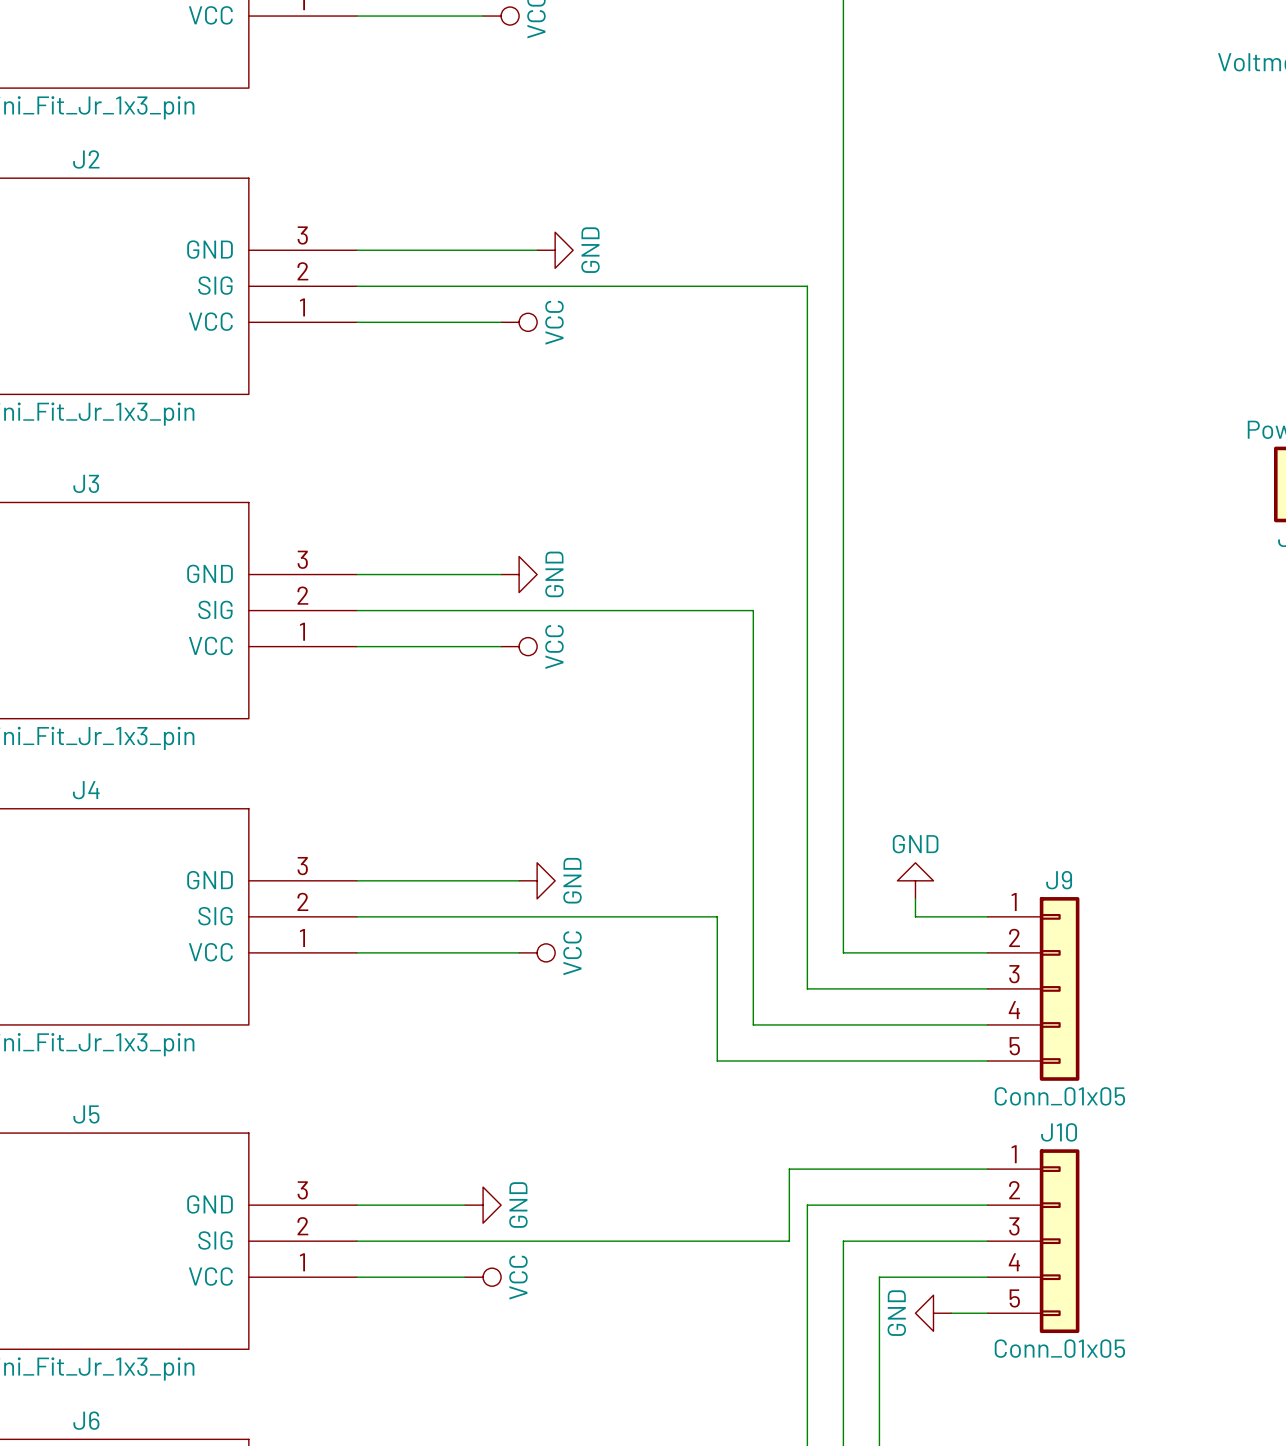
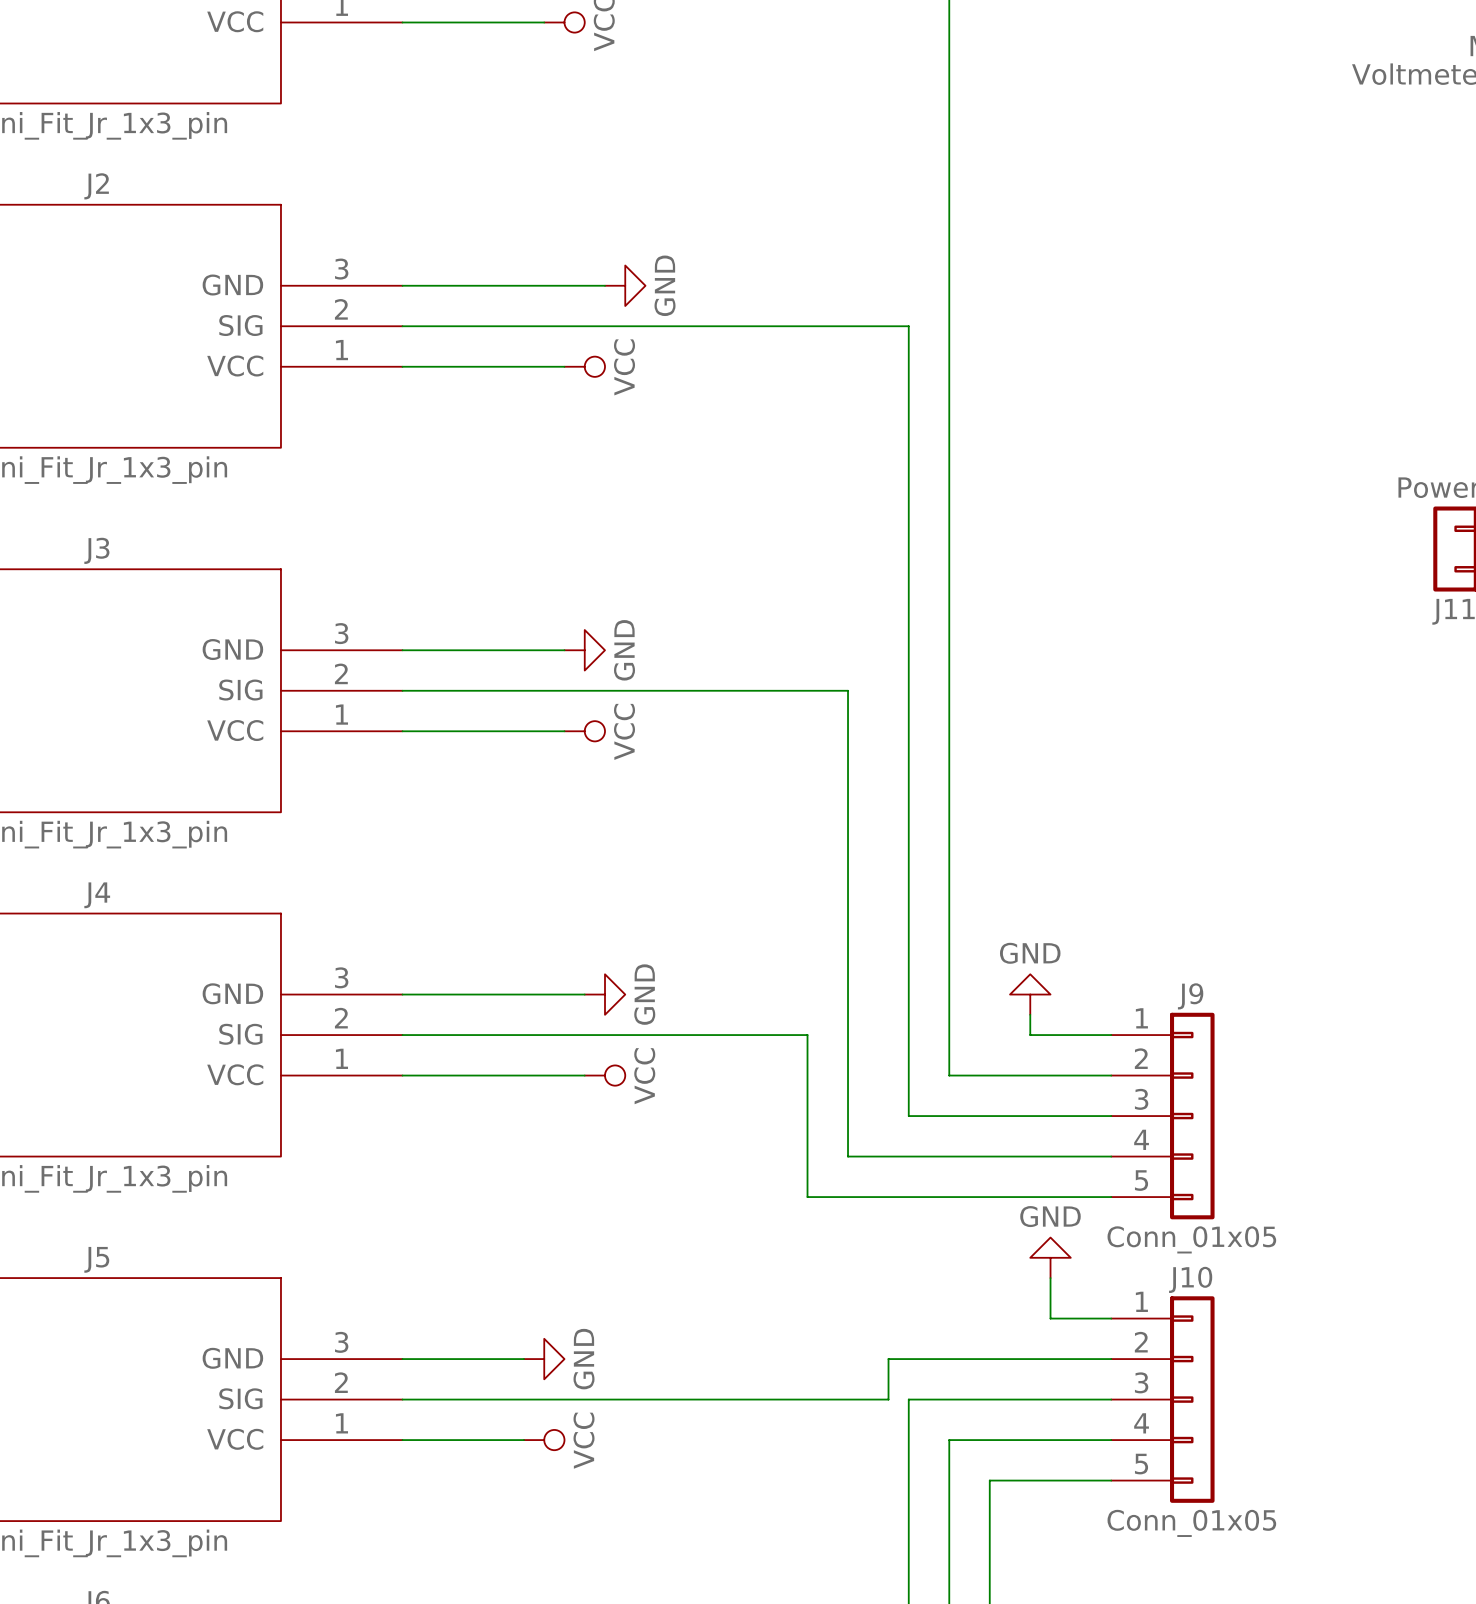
wire: (933, 1169) (789, 1169) (789, 1205) -> (1050, 1318) (1050, 1278)
wire: (807, 1205) (807, 1241) -> (908, 1359) (888, 1359)
wire: (843, 1241) (843, 1277) -> (949, 1399) (908, 1399)
wire: (879, 1277) (879, 1313) -> (989, 1440) (949, 1440)
wire: none -> (989, 1480) (1070, 1480)
power symbol rotation: 0° (933, 1313) -> 90° clockwise (1050, 1257)
power symbol position: GND (933, 1313) -> GND (1050, 1257)

